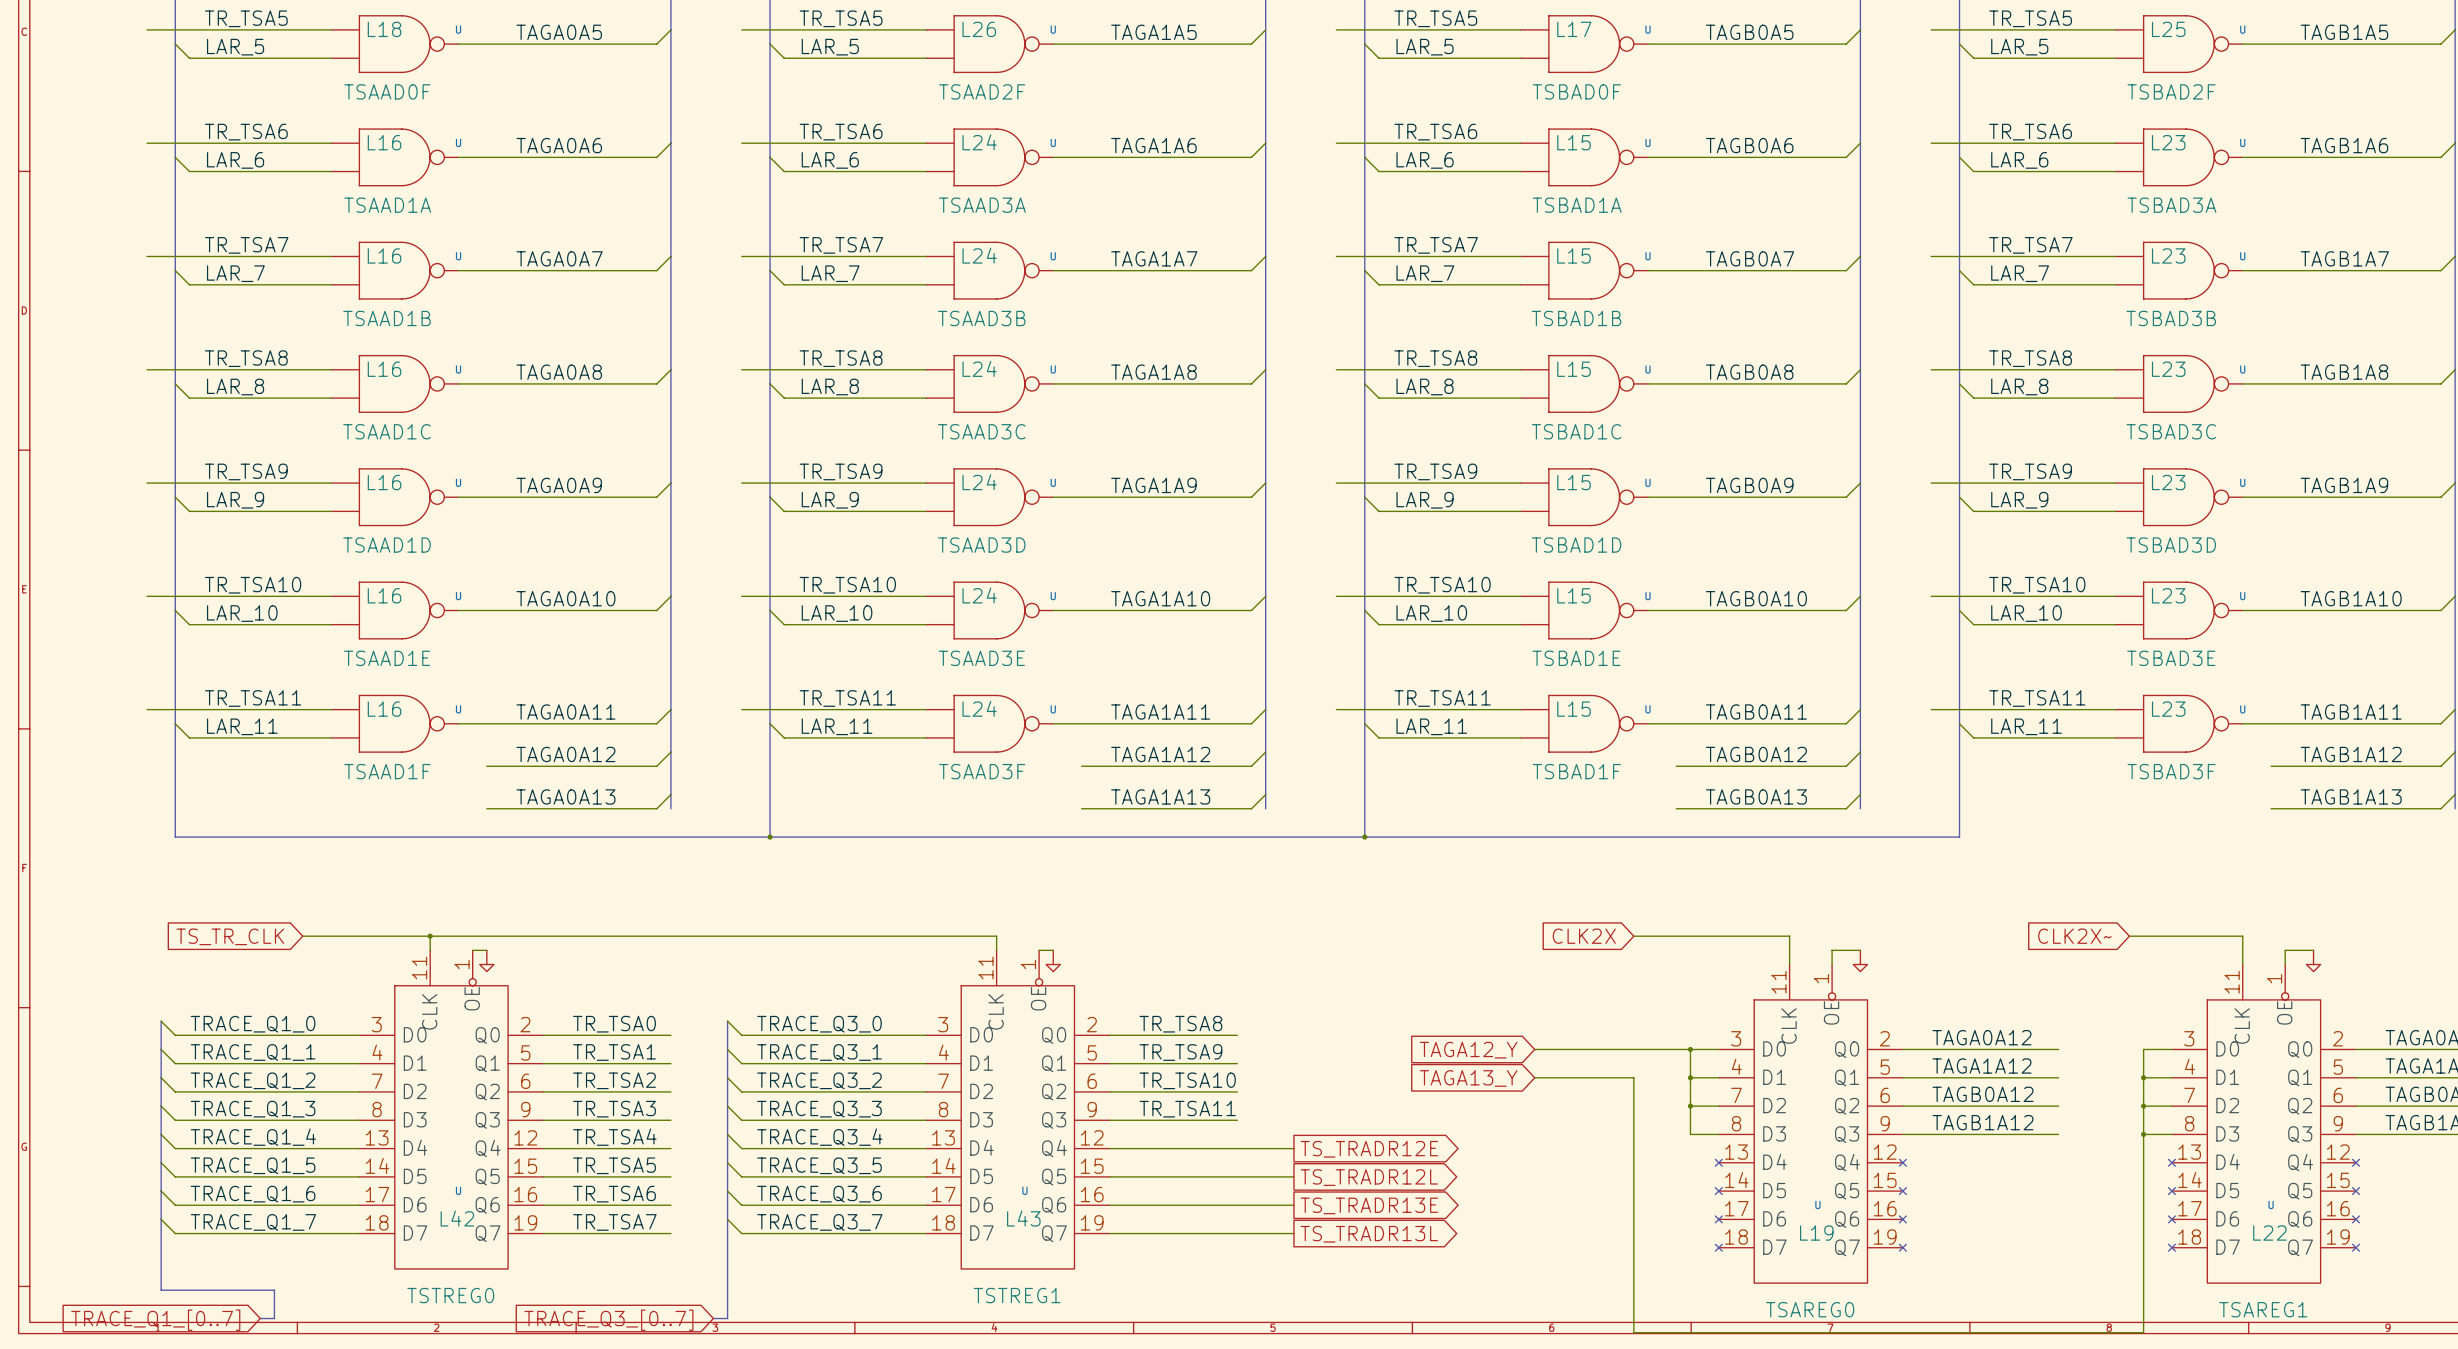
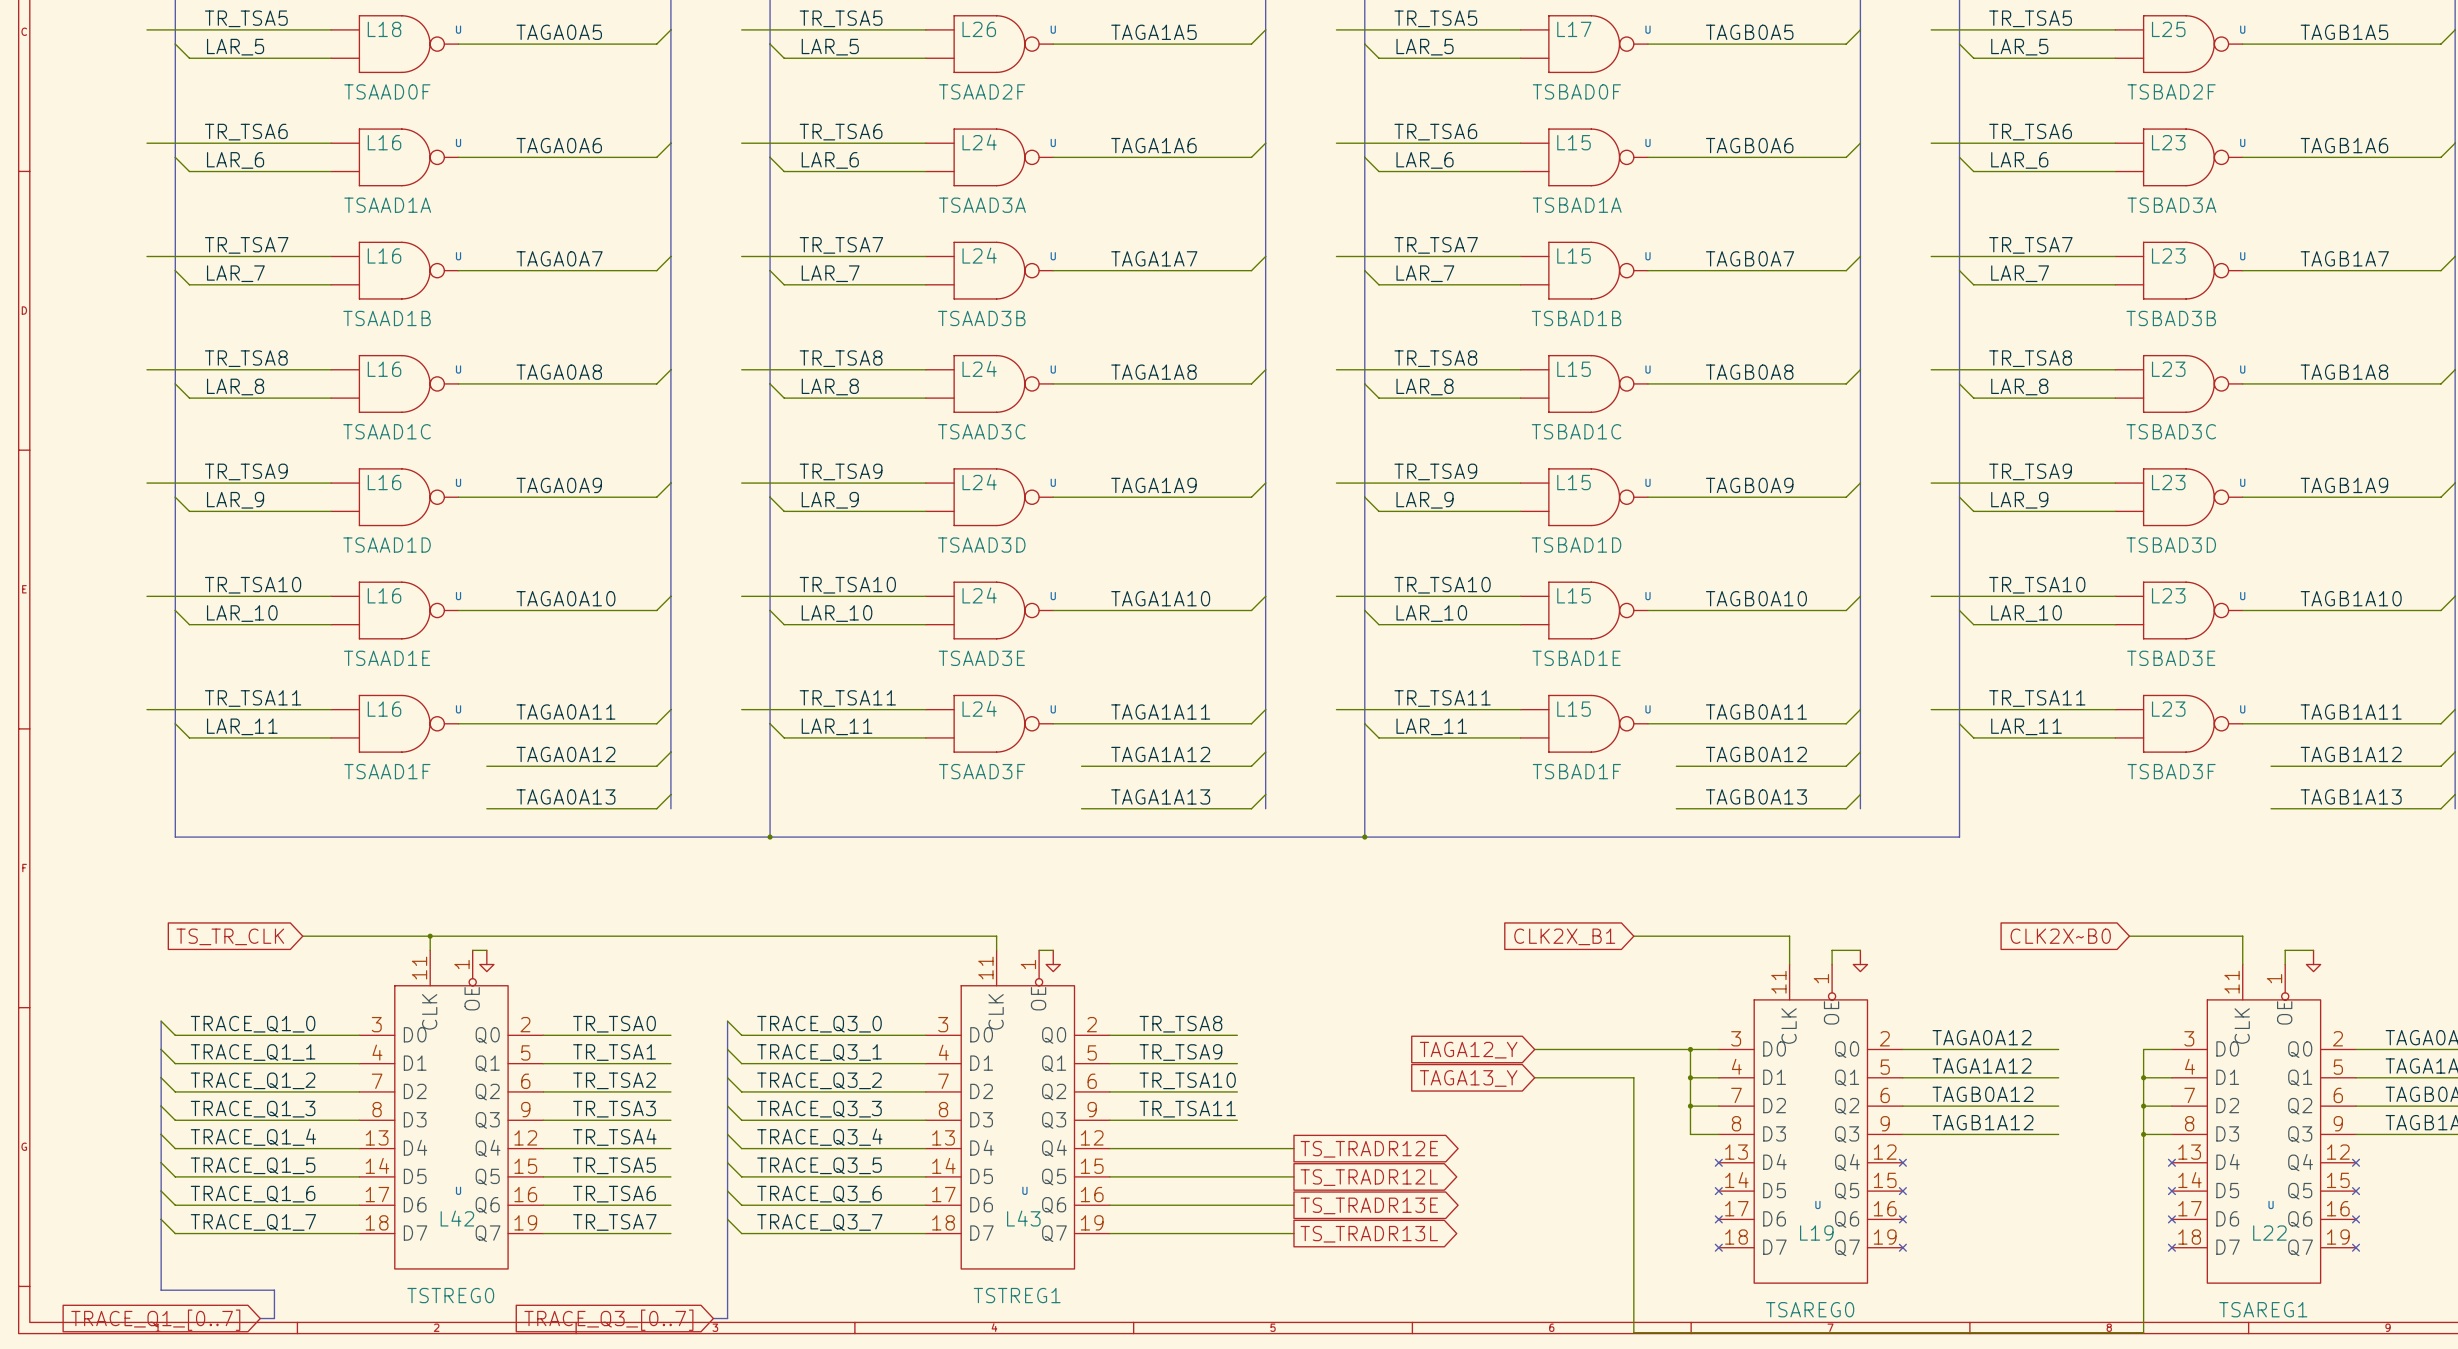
global label: CLK2X (1584, 936) -> CLK2X_B1 (1564, 936)
global label: CLK2X~ (2074, 936) -> CLK2X~B0 (2060, 936)

